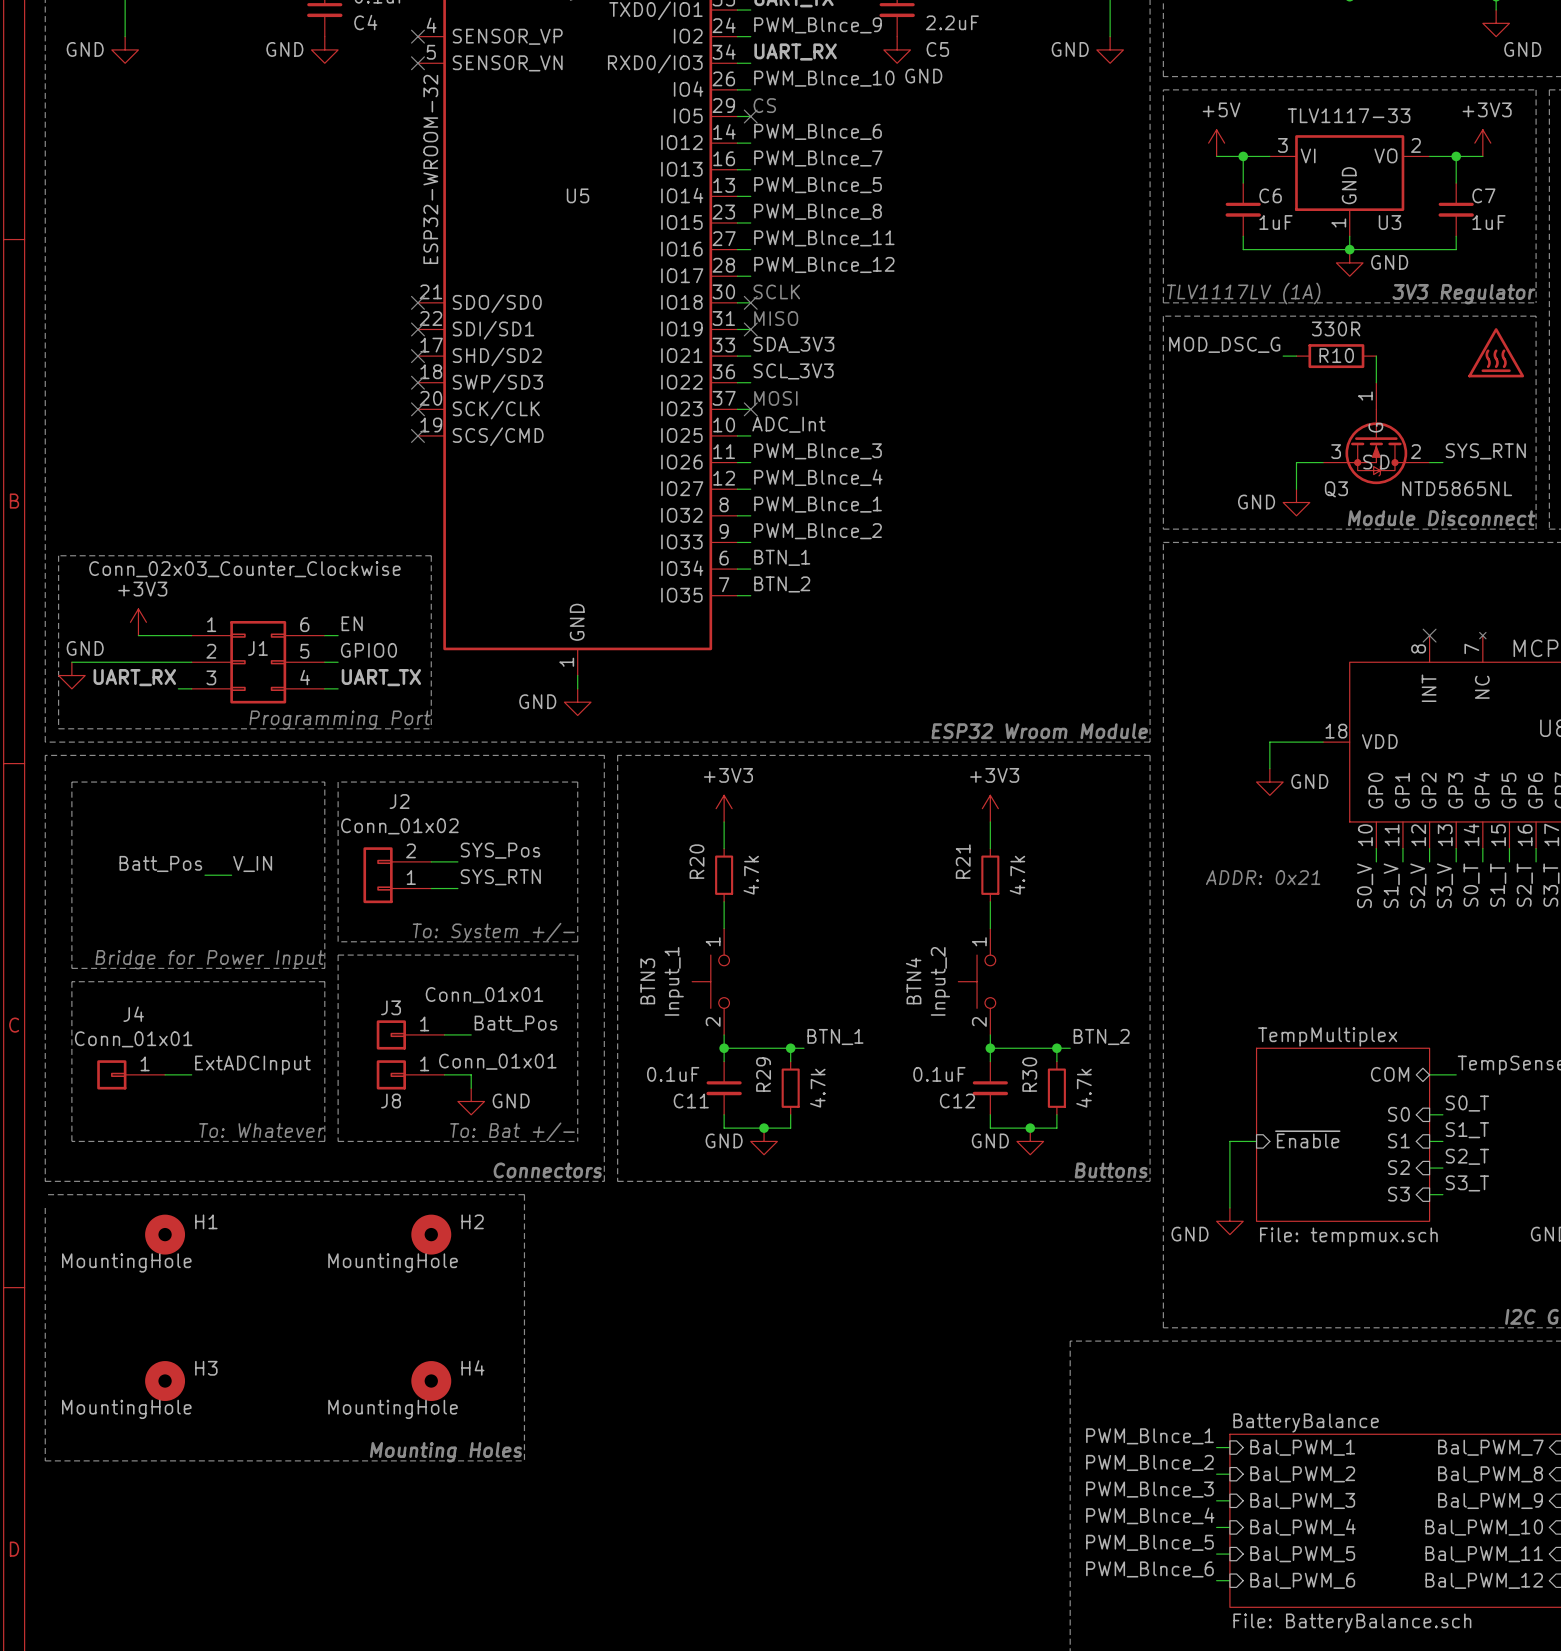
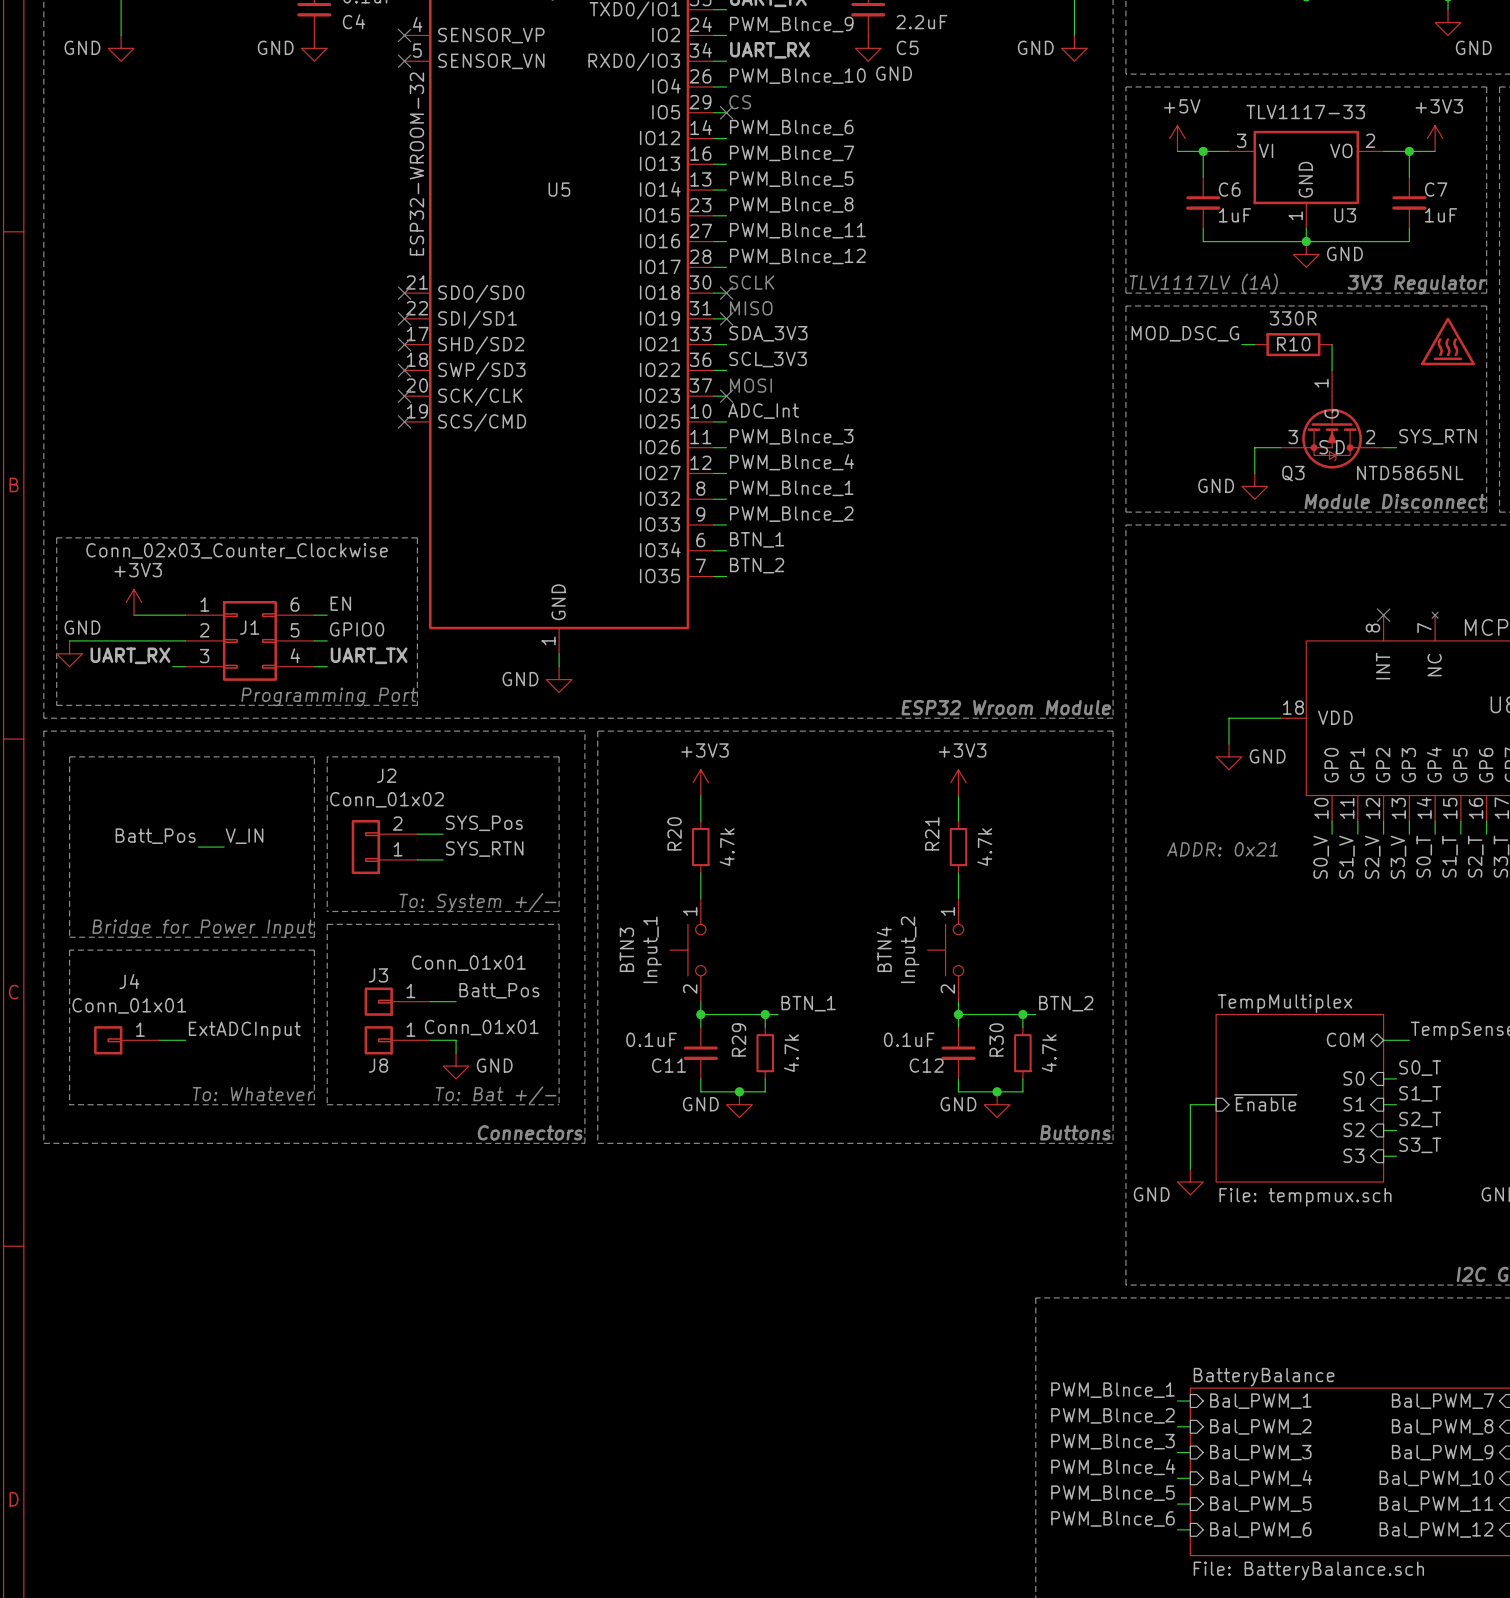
line: (45, 1194) (524, 1194) (524, 1460) (45, 1460) (45, 1207) -> none
H1: MountingHole (165, 1234) -> none
H2: MountingHole (431, 1234) -> none
H3: MountingHole (165, 1381) -> none
H4: MountingHole (431, 1381) -> none
text: Mounting Holes (445, 1452) -> none

